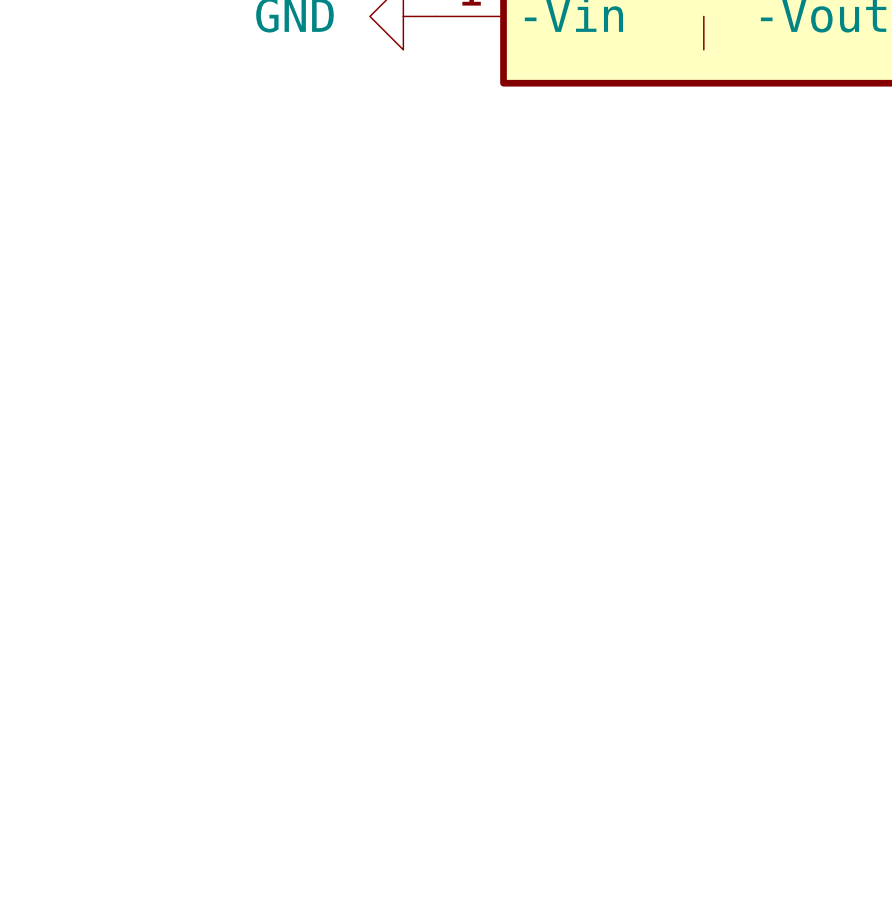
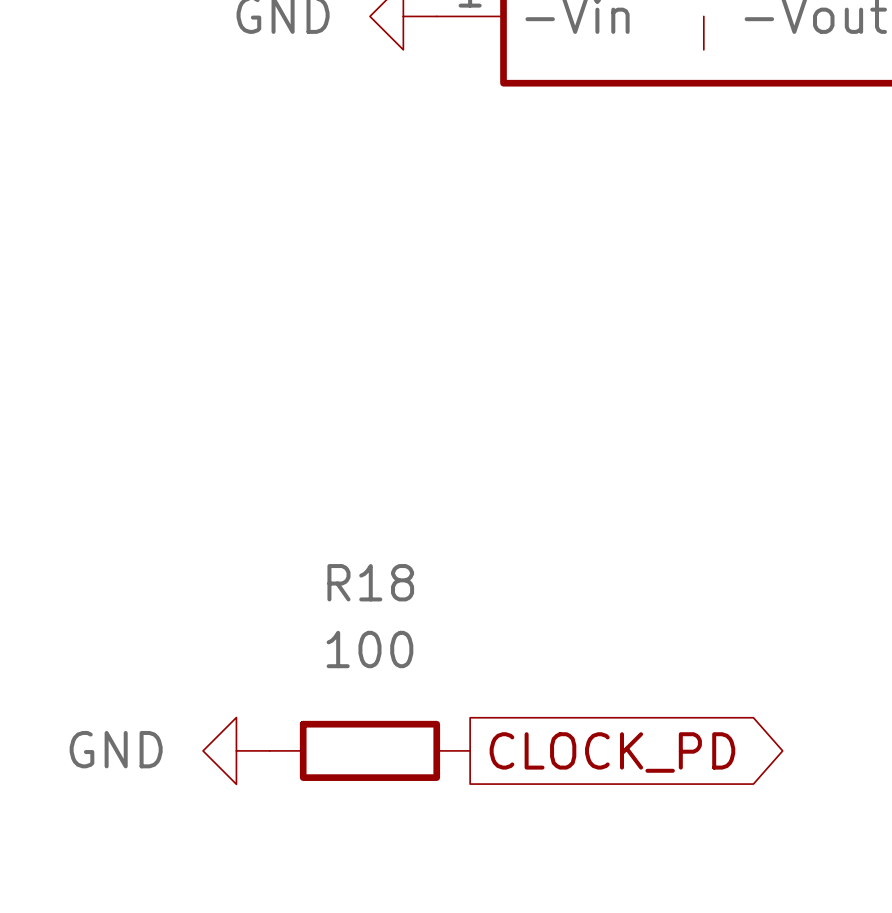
power symbol: none -> GND (236, 750)
R18: none -> 100 (369, 750)
global label: none -> CLOCK_PD (612, 752)

